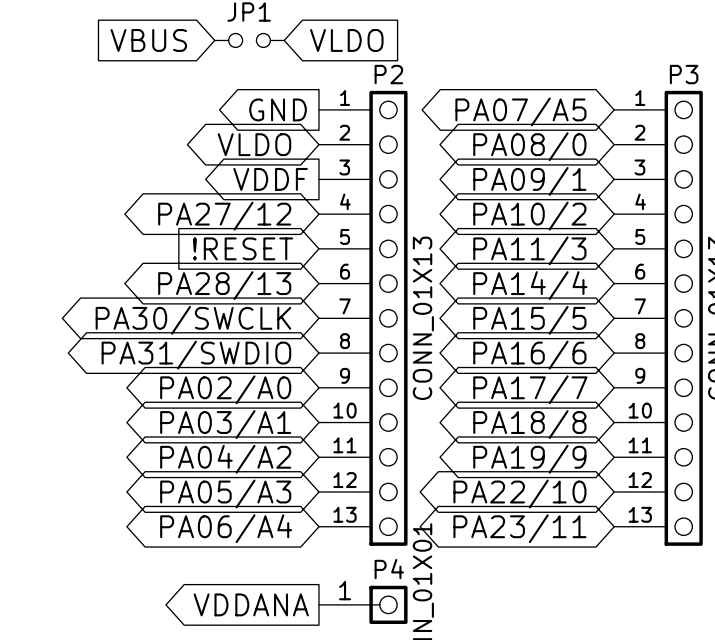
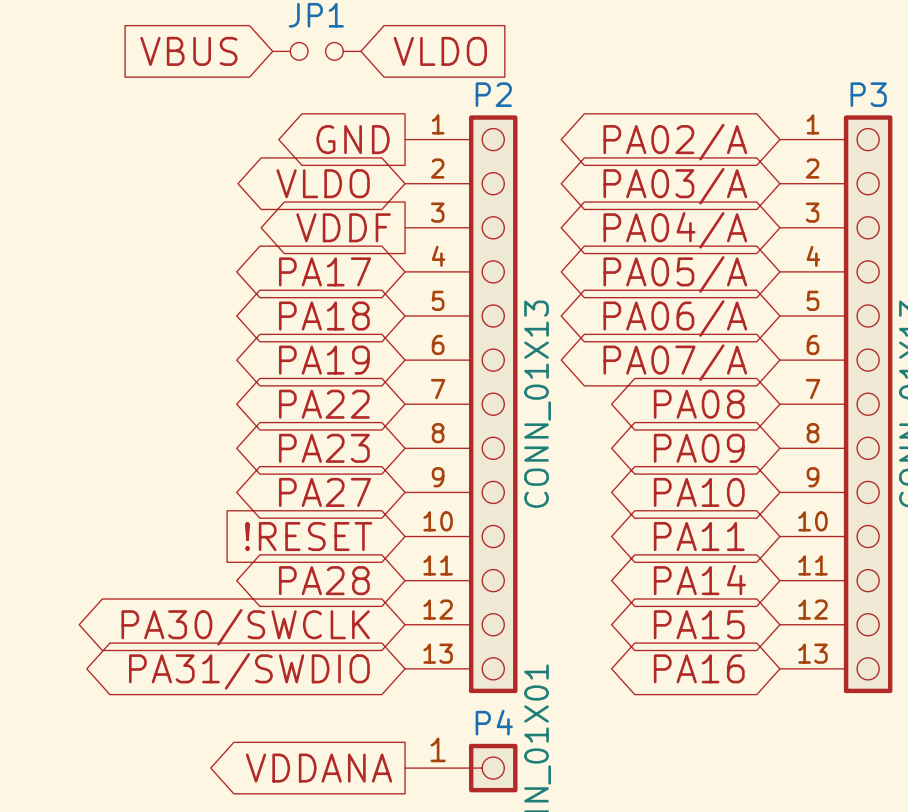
global label: PA07/A5 (520, 111) -> PA02/A (675, 142)
global label: PA08/0 (529, 146) -> PA03/A (675, 186)
global label: PA09/1 (529, 181) -> PA04/A (675, 230)
global label: PA27/12 (224, 216) -> PA17 (325, 271)
global label: PA10/2 (529, 216) -> PA05/A (675, 274)
global label shape: input (243, 248) -> bidirectional (324, 316)
global label: !RESET (243, 248) -> PA18 (324, 316)
global label: PA11/3 (529, 250) -> PA06/A (675, 318)
global label: PA28/13 (224, 285) -> PA19 (324, 360)
global label: PA14/4 (530, 285) -> PA07/A (675, 362)
global label: PA30/SWCLK (193, 320) -> PA22 (324, 404)
global label: PA15/5 (529, 320) -> PA08 (699, 404)
global label: PA31/SWDIO (196, 355) -> PA23 (324, 448)
global label: PA16/6 (529, 355) -> PA09 (699, 448)
global label: PA02/A0 (225, 389) -> PA27 (325, 492)
global label: PA17/7 (530, 389) -> PA10 (699, 492)
global label shape: bidirectional (225, 424) -> input (308, 536)
global label: PA03/A1 (225, 424) -> !RESET (308, 536)
global label: PA18/8 (529, 424) -> PA11 (699, 536)
global label: PA04/A2 (225, 459) -> PA28 (324, 580)
global label: PA19/9 (529, 459) -> PA14 (699, 580)
global label: PA05/A3 (225, 493) -> PA30/SWCLK (245, 627)
global label: PA22/10 (519, 493) -> PA15 (699, 624)
global label: PA06/A4 (226, 528) -> PA31/SWDIO (249, 671)
global label: PA23/11 (519, 528) -> PA16 (699, 668)

